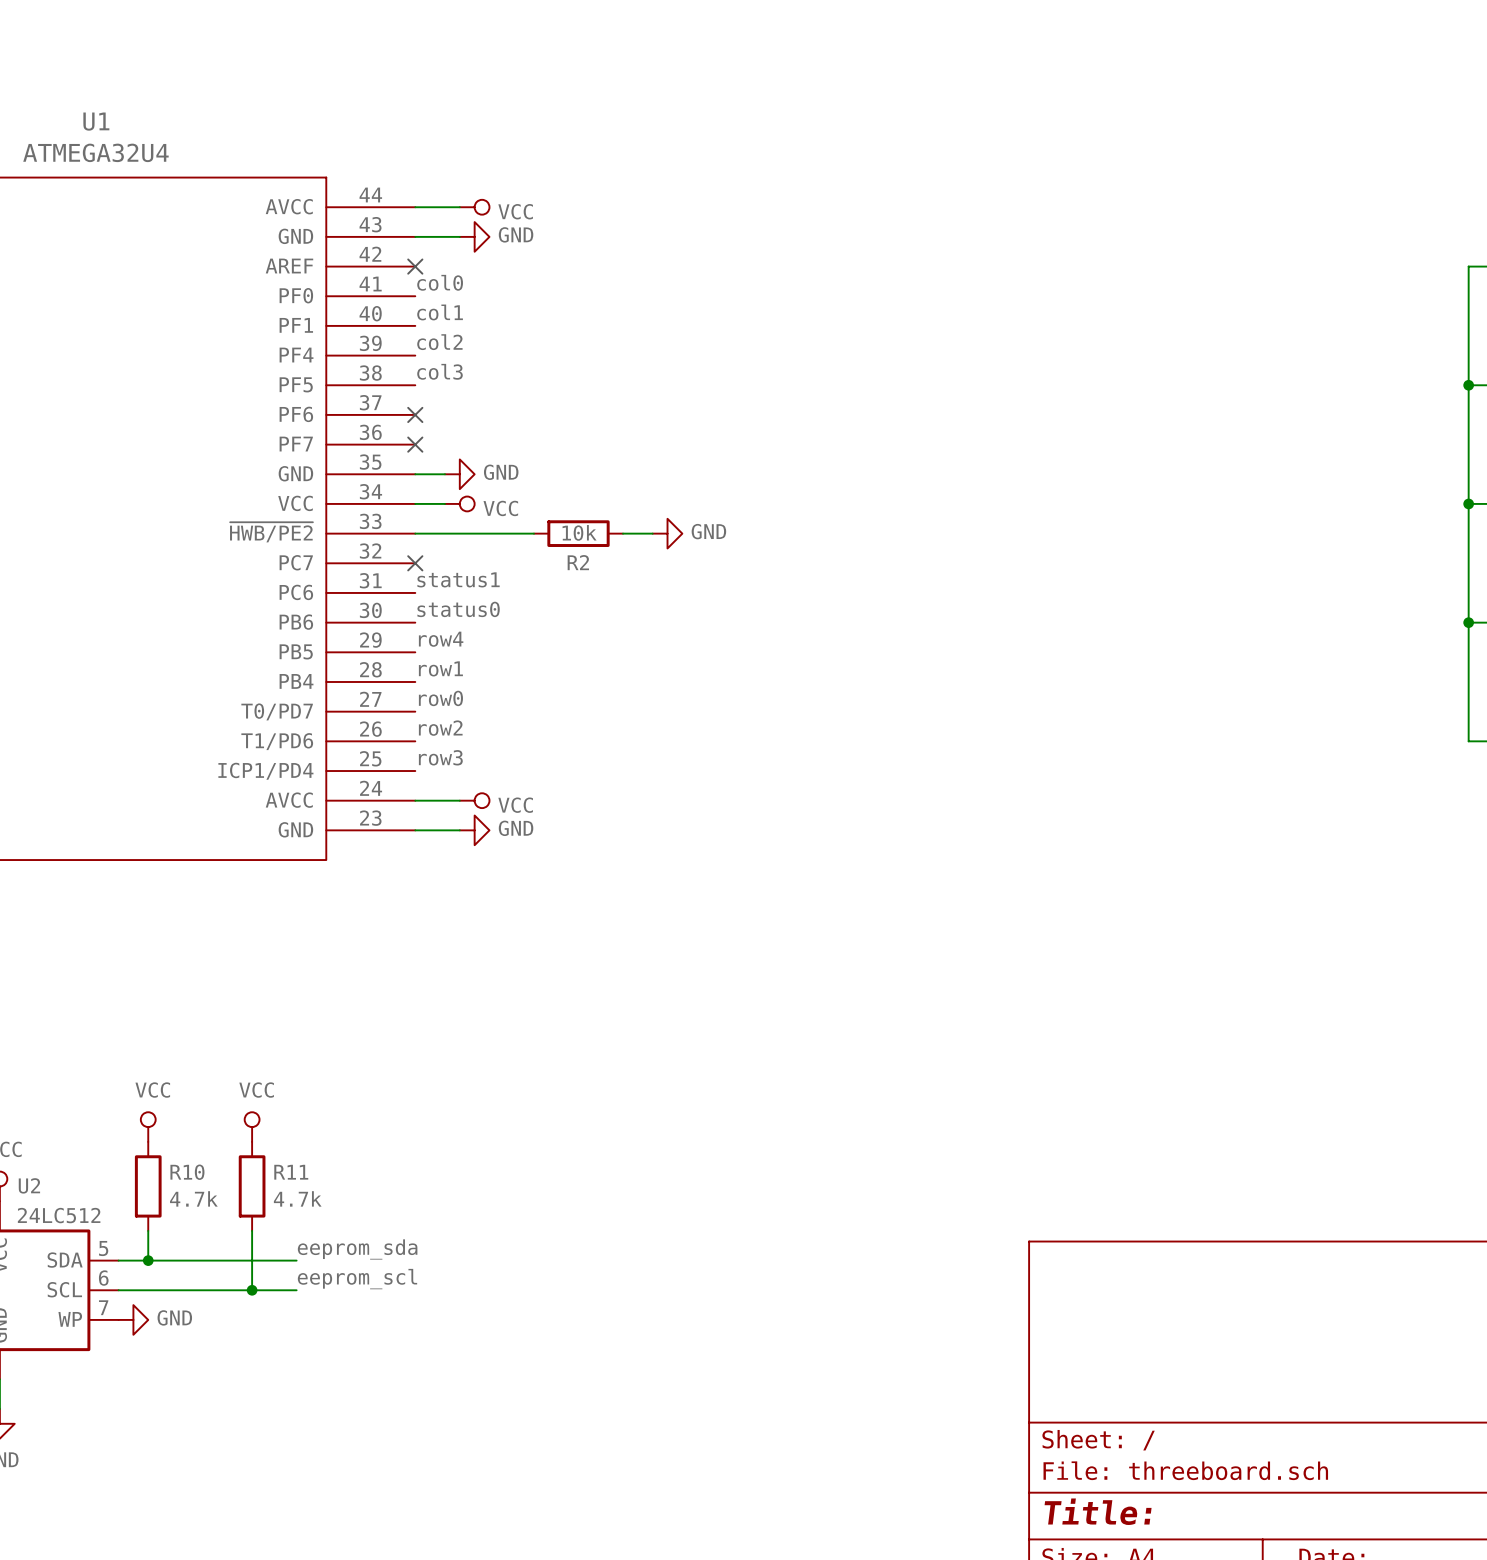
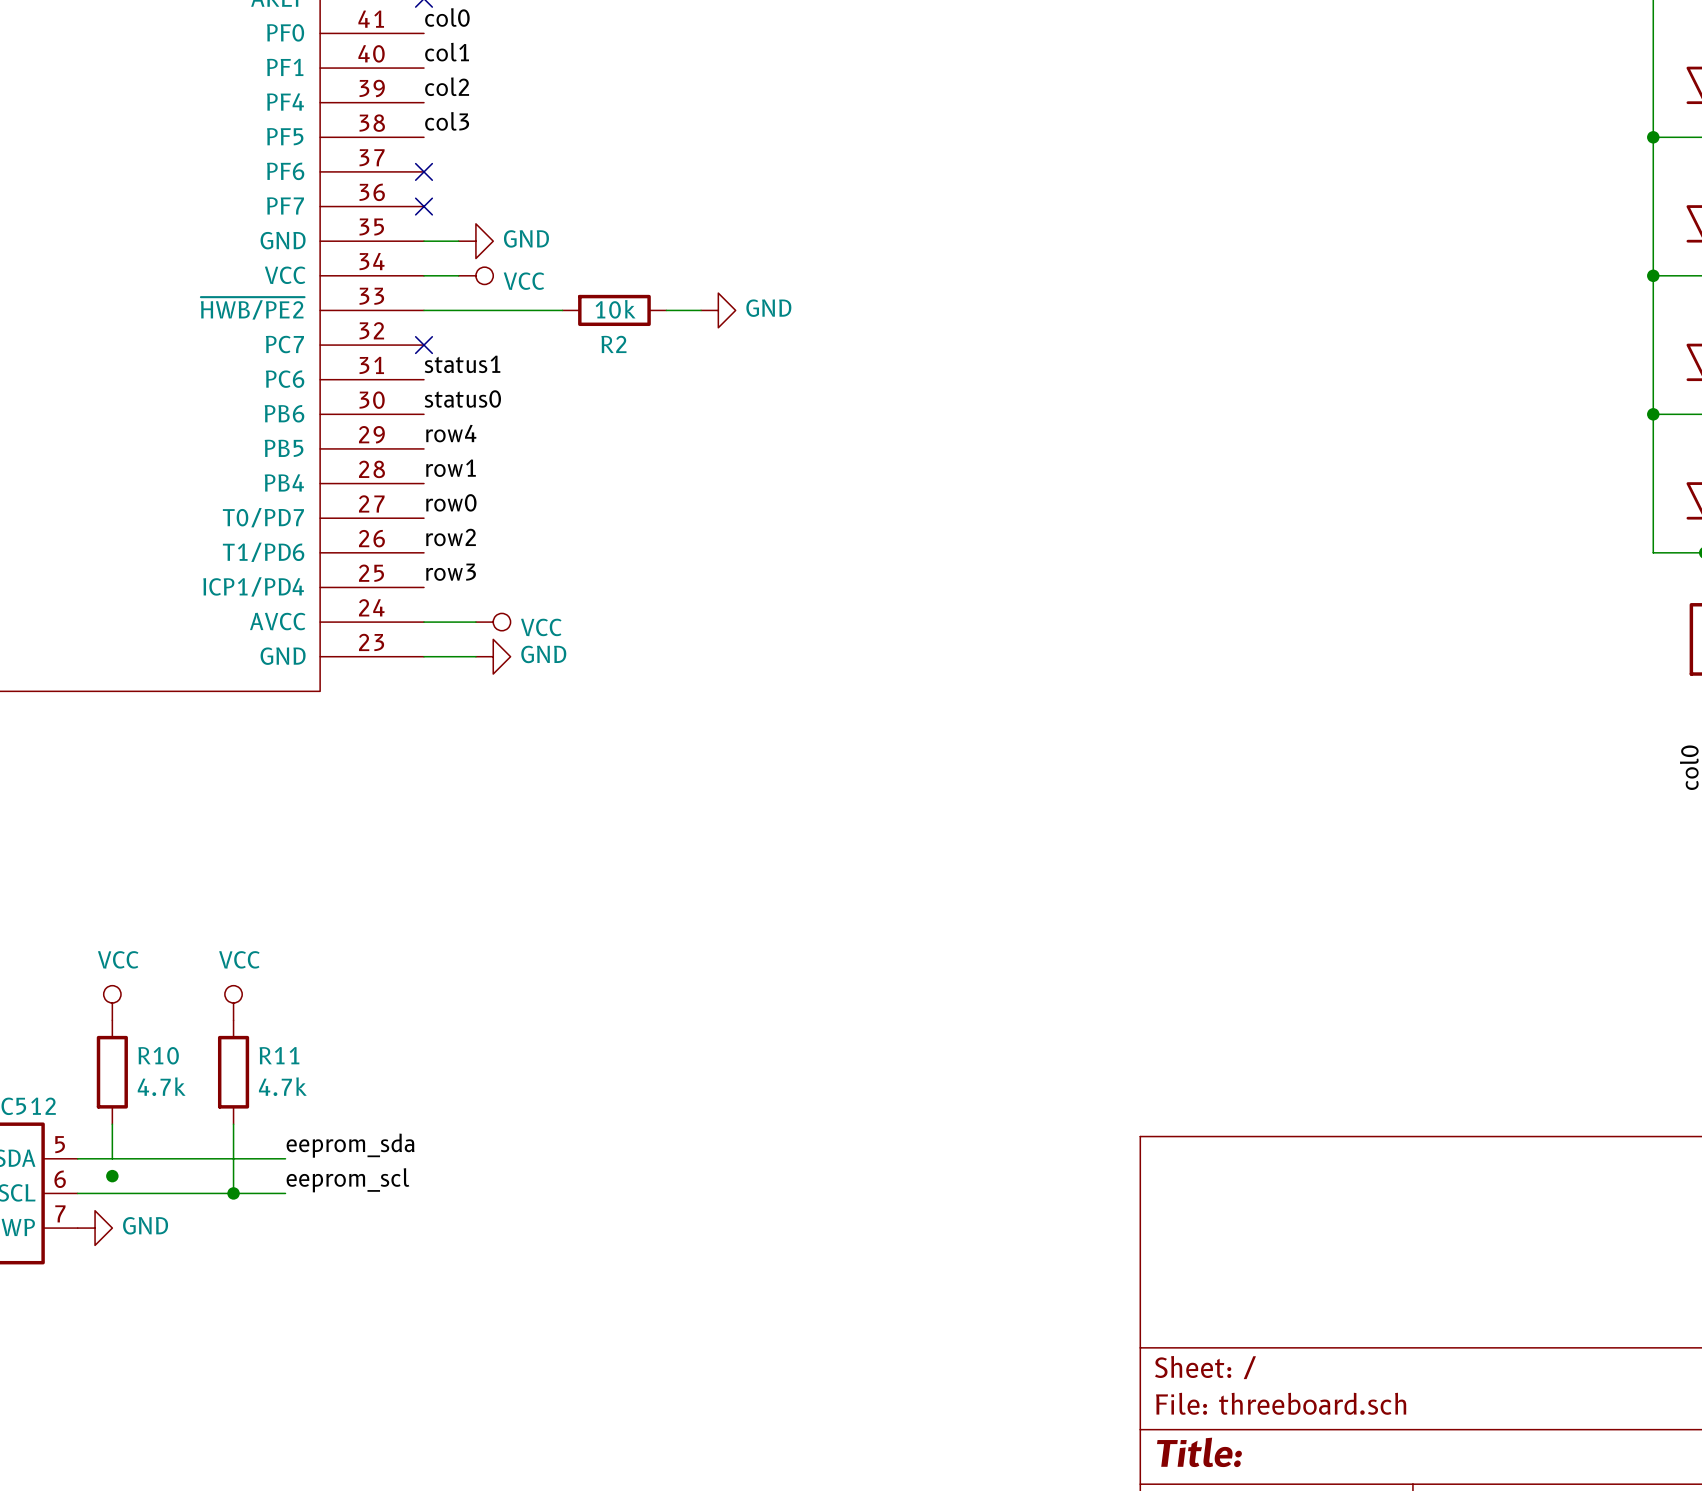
junction position: (148, 1260) -> (112, 1176)

